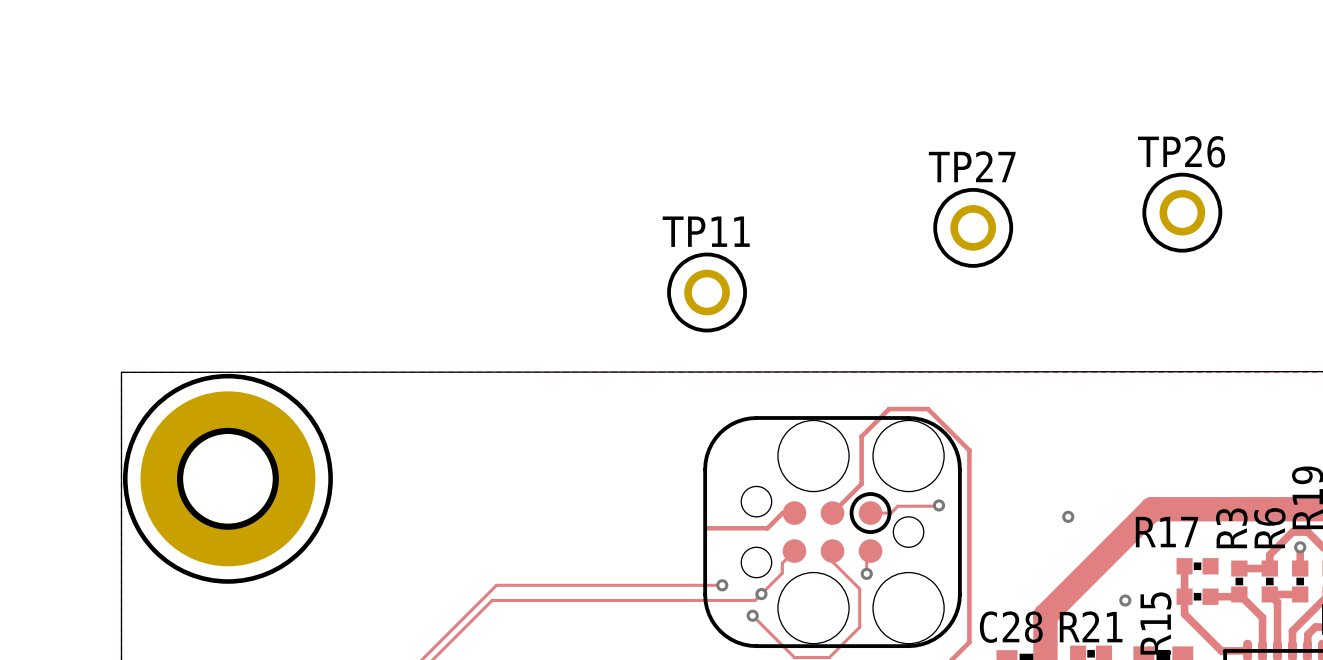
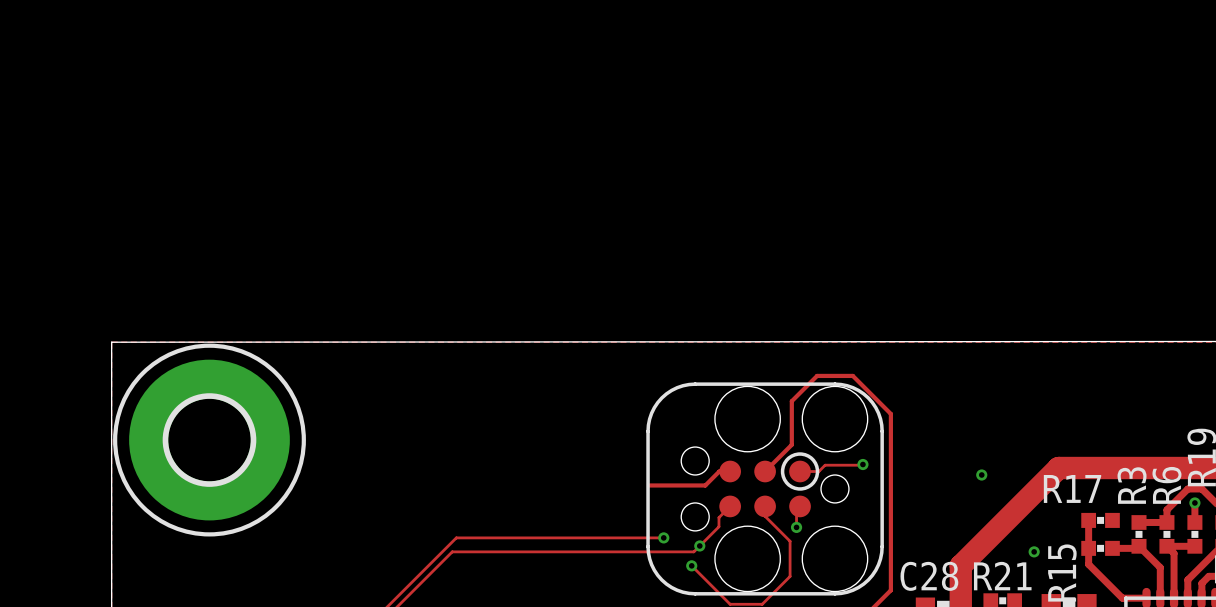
TP26: (1182, 212) -> none
TP27: (973, 227) -> none
TP11: (707, 292) -> none

